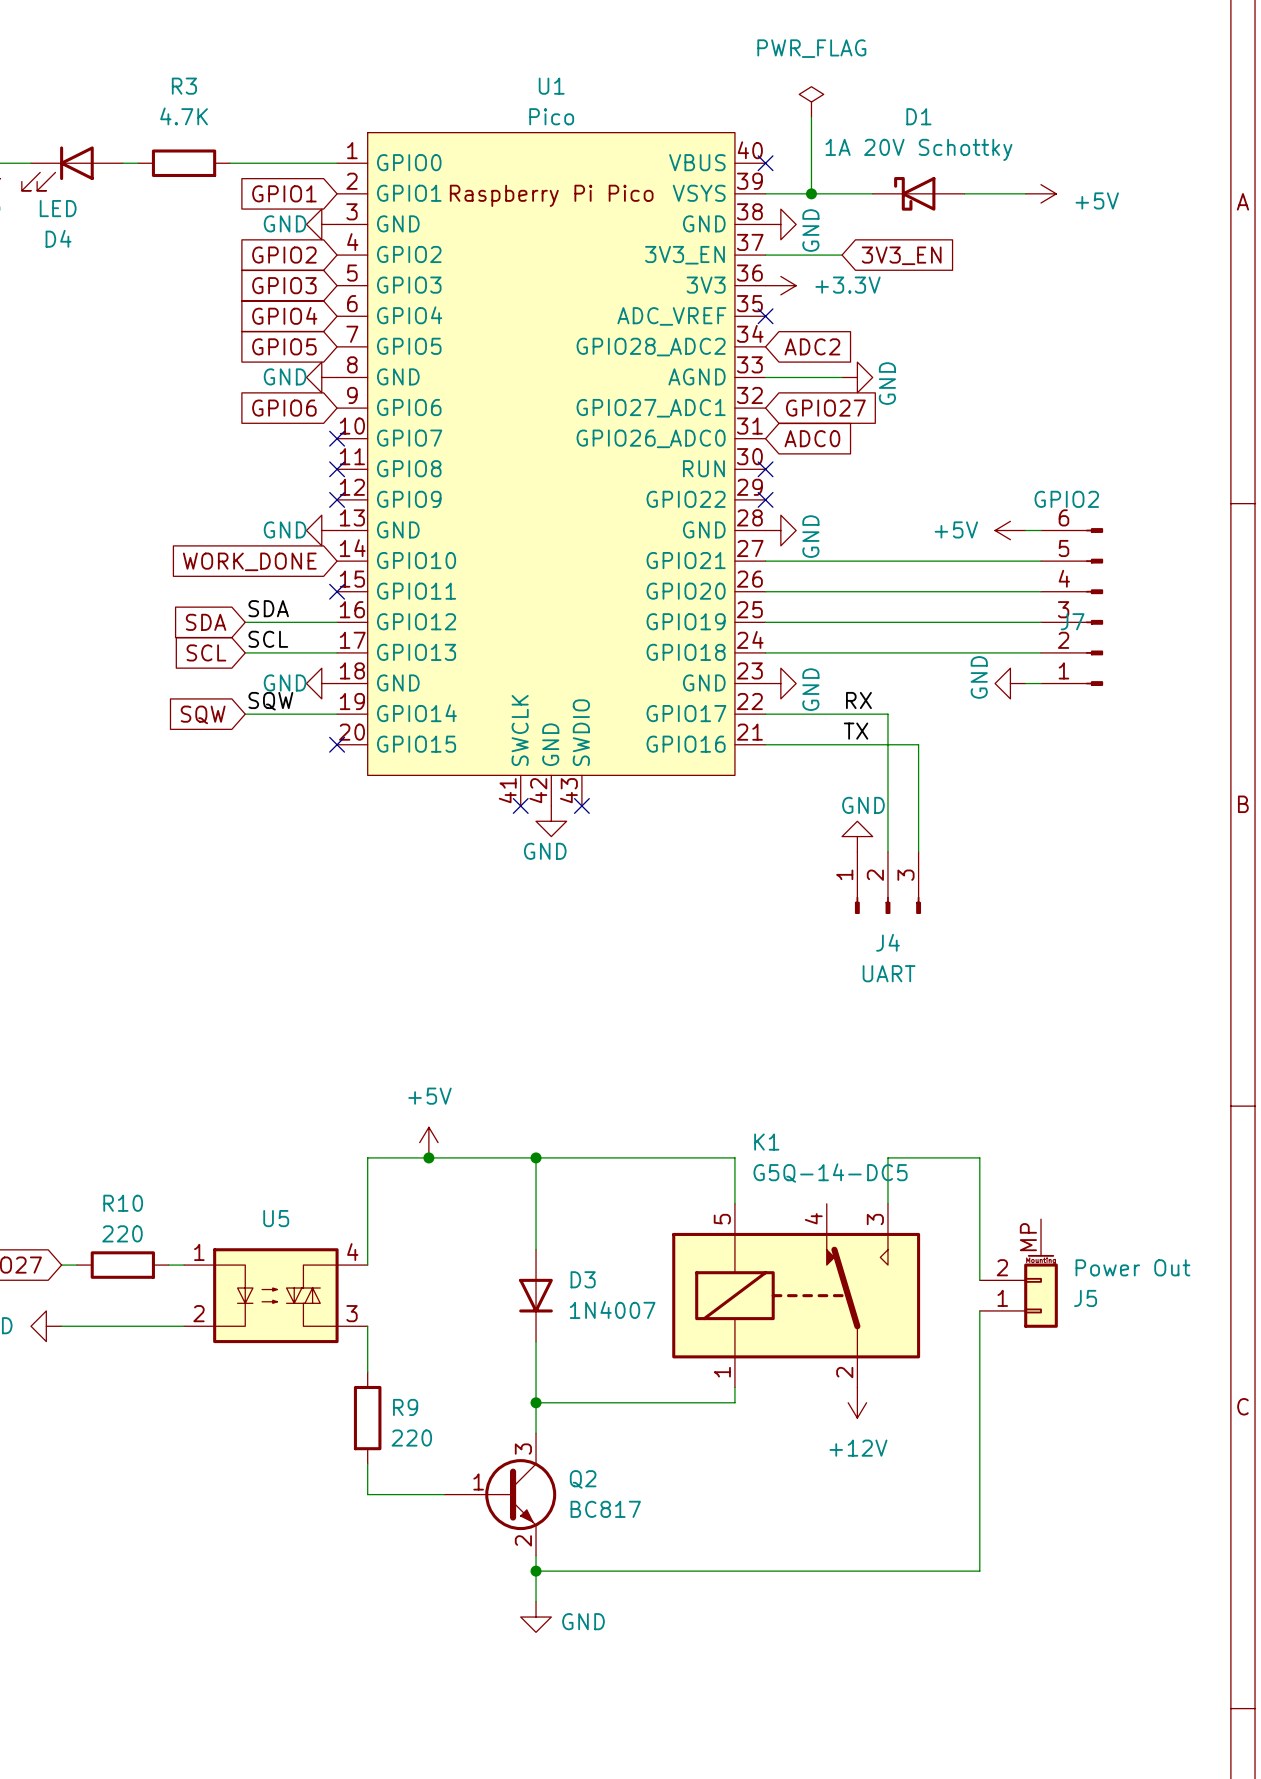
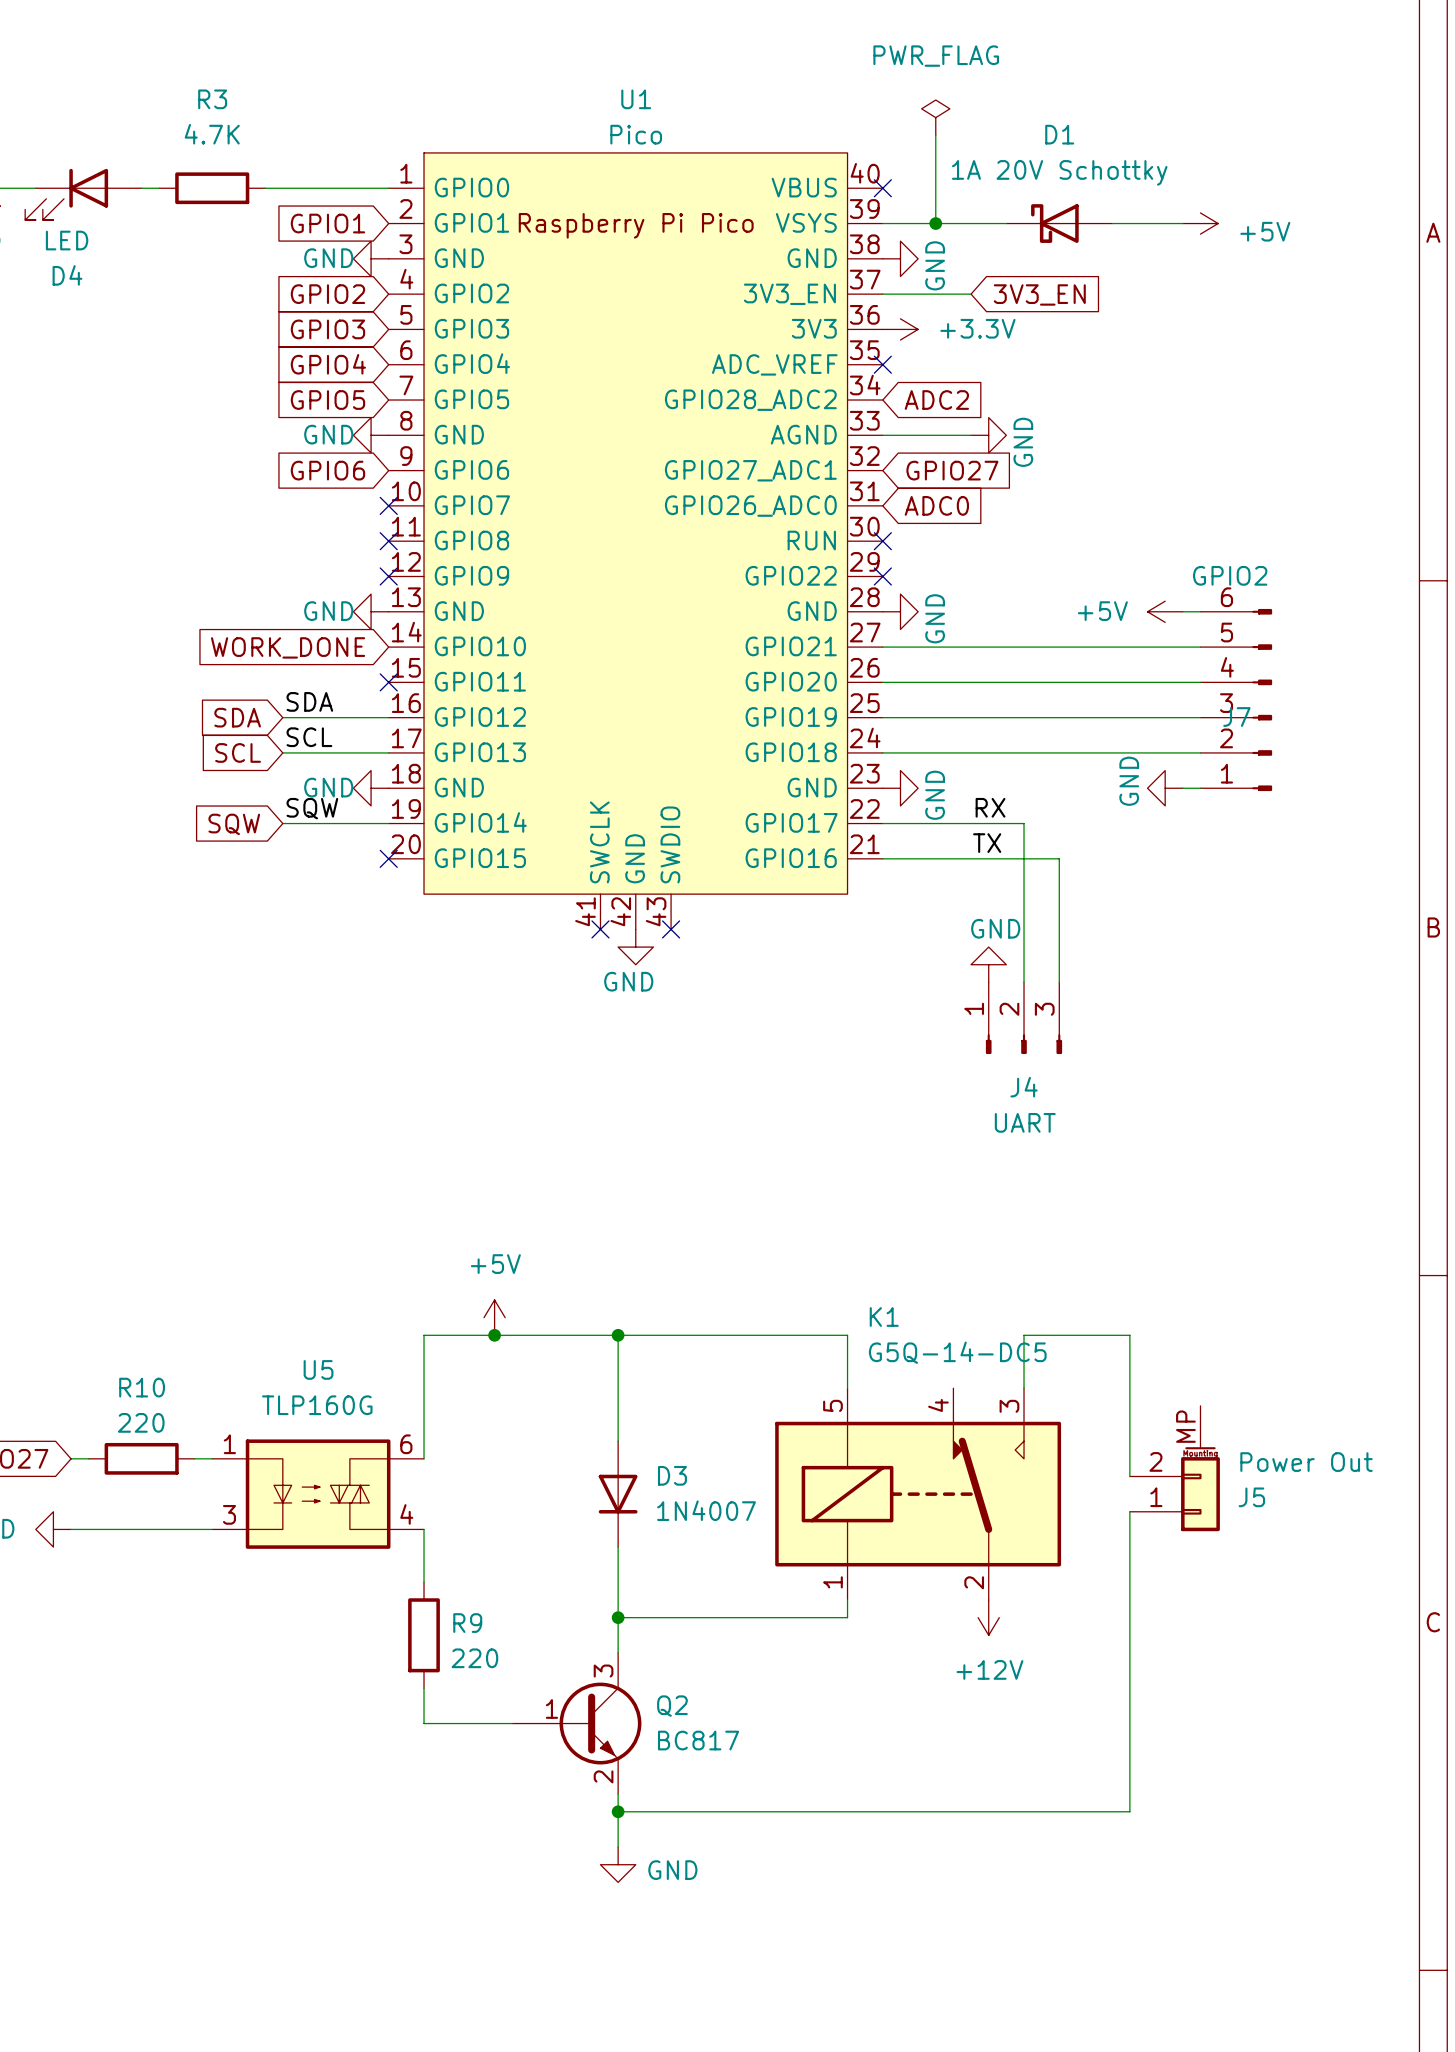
U5 value: none -> TLP160G (317, 1405)
U5 name position: U5 (276, 1218) -> U5 (318, 1369)
U5 pin number: 4 (352, 1252) -> 6 (406, 1444)
U5 pin number: 2 (198, 1313) -> 3 (229, 1514)
U5 pin number: 3 (352, 1313) -> 4 (406, 1514)

